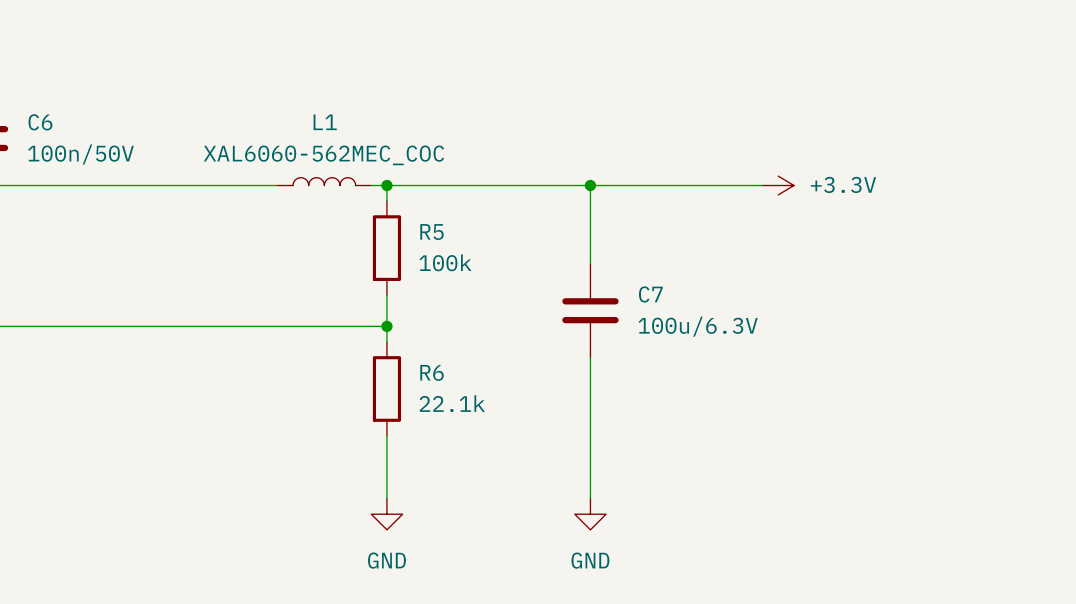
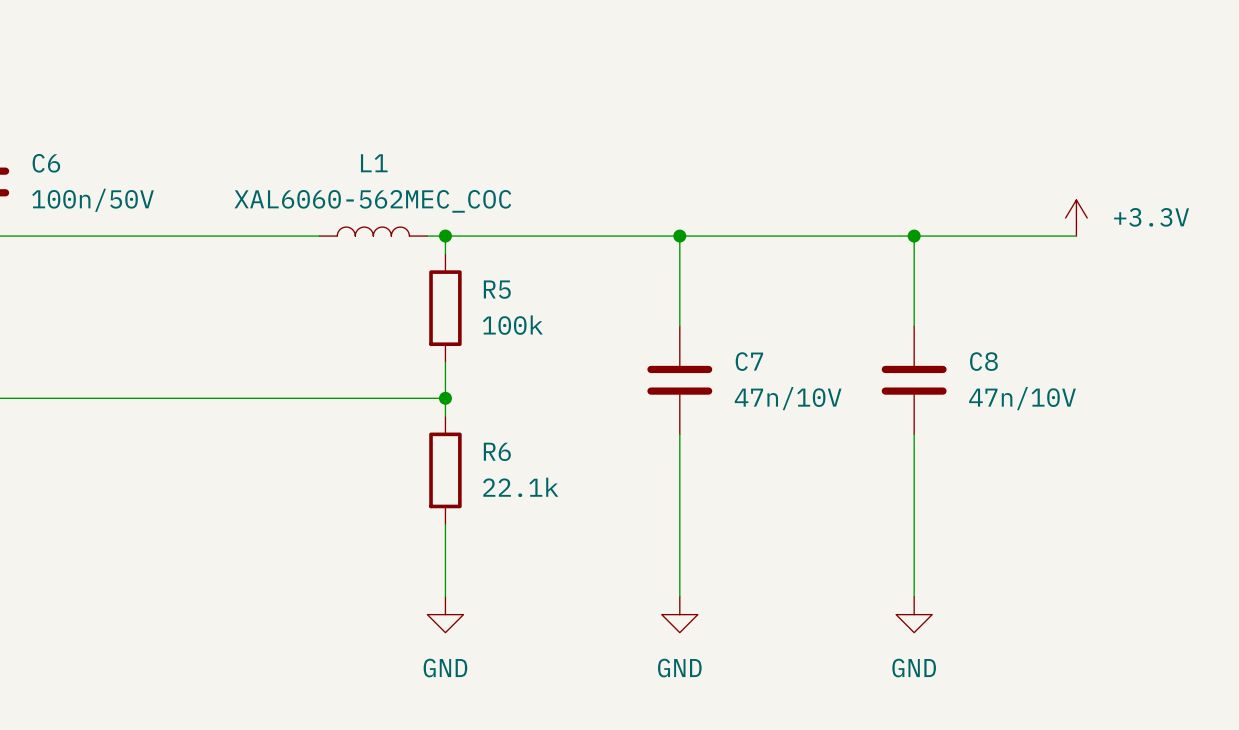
wire: none -> (878, 236) (1076, 236)
power symbol rotation: 0° (778, 185) -> 90° counterclockwise (1076, 218)
power symbol position: +3.3V (778, 185) -> +3.3V (1076, 218)
wire: none -> (914, 236) (914, 326)
junction: none -> (914, 236)
C8: none -> 47n/10V (914, 380)
C7 value: 100u/6.3V (698, 326) -> 47n/10V (788, 398)
wire: none -> (914, 434) (914, 596)
power symbol: none -> GND (914, 614)

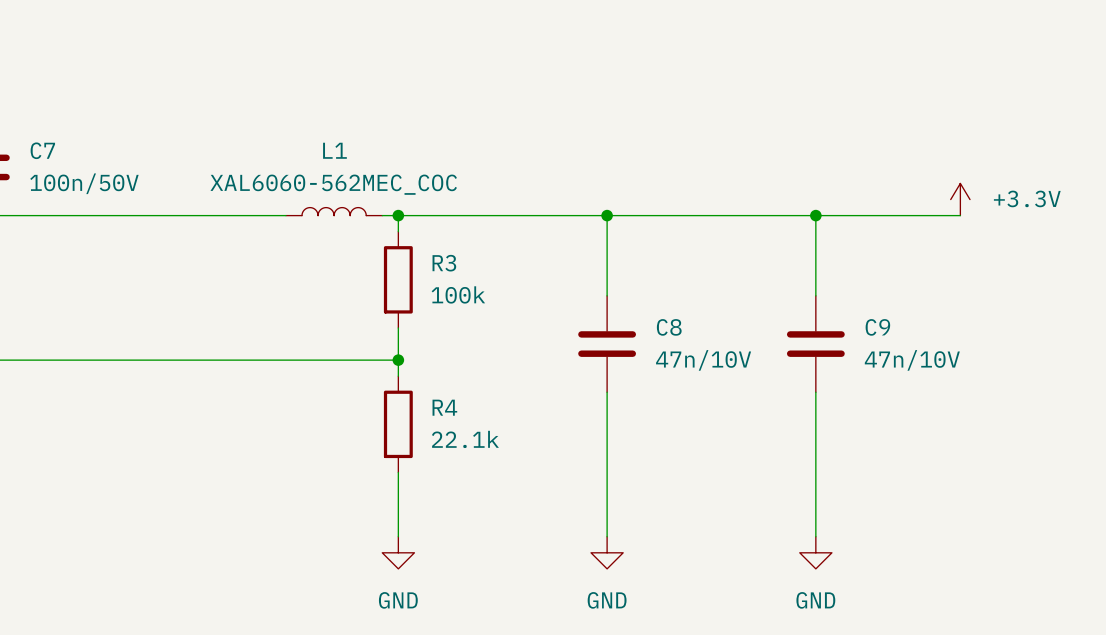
C6 name: C6 (46, 163) -> C7 (42, 150)
R5 name: R5 (497, 289) -> R3 (444, 263)
C7 name: C7 (749, 361) -> C8 (669, 327)
C8 name: C8 (983, 361) -> C9 (877, 327)
R6 name: R6 (497, 451) -> R4 (444, 407)

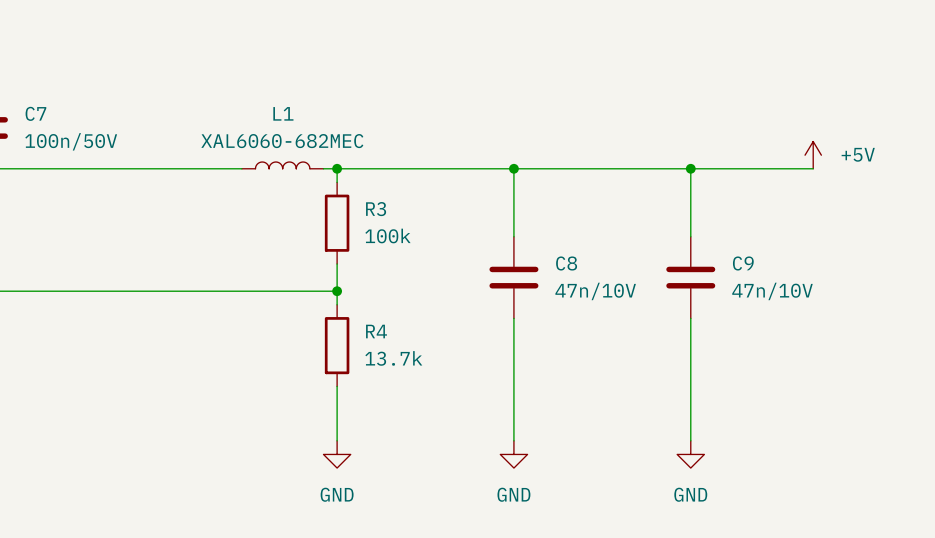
L1 value: XAL6060-562MEC_COC (333, 184) -> XAL6060-682MEC (282, 141)
power symbol: +3.3V (960, 199) -> +5V (813, 155)
R4 value: 22.1k (465, 439) -> 13.7k (393, 358)

